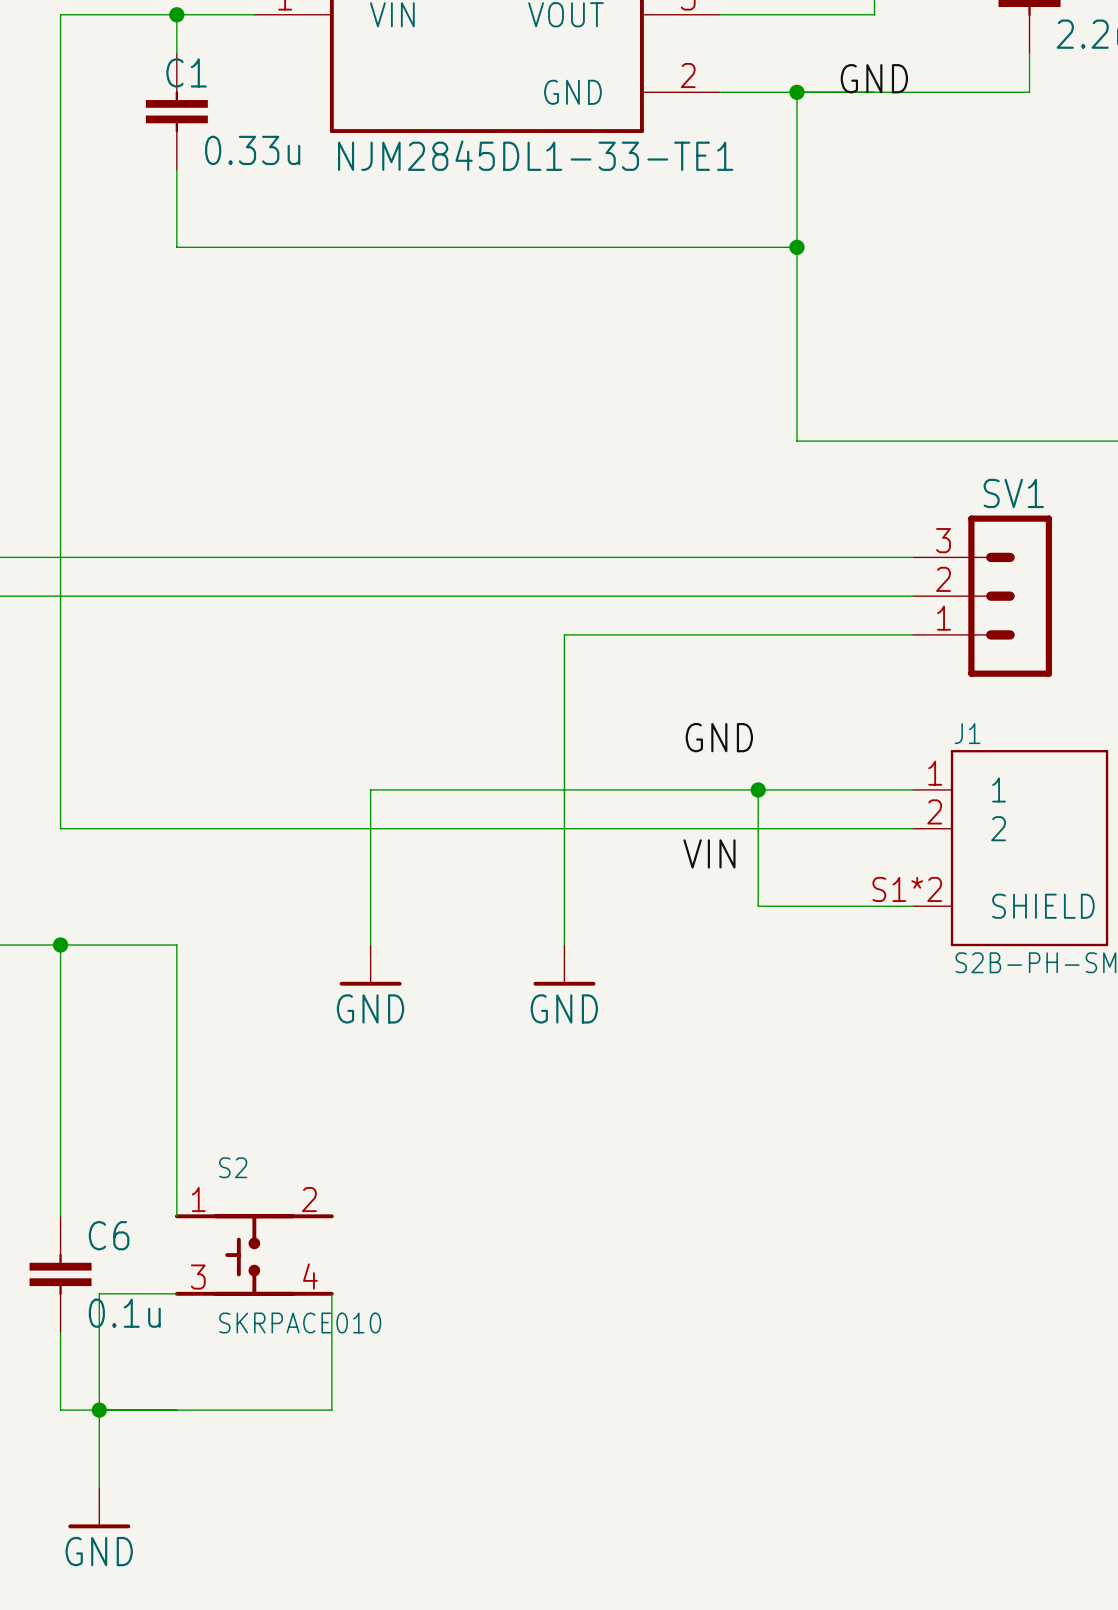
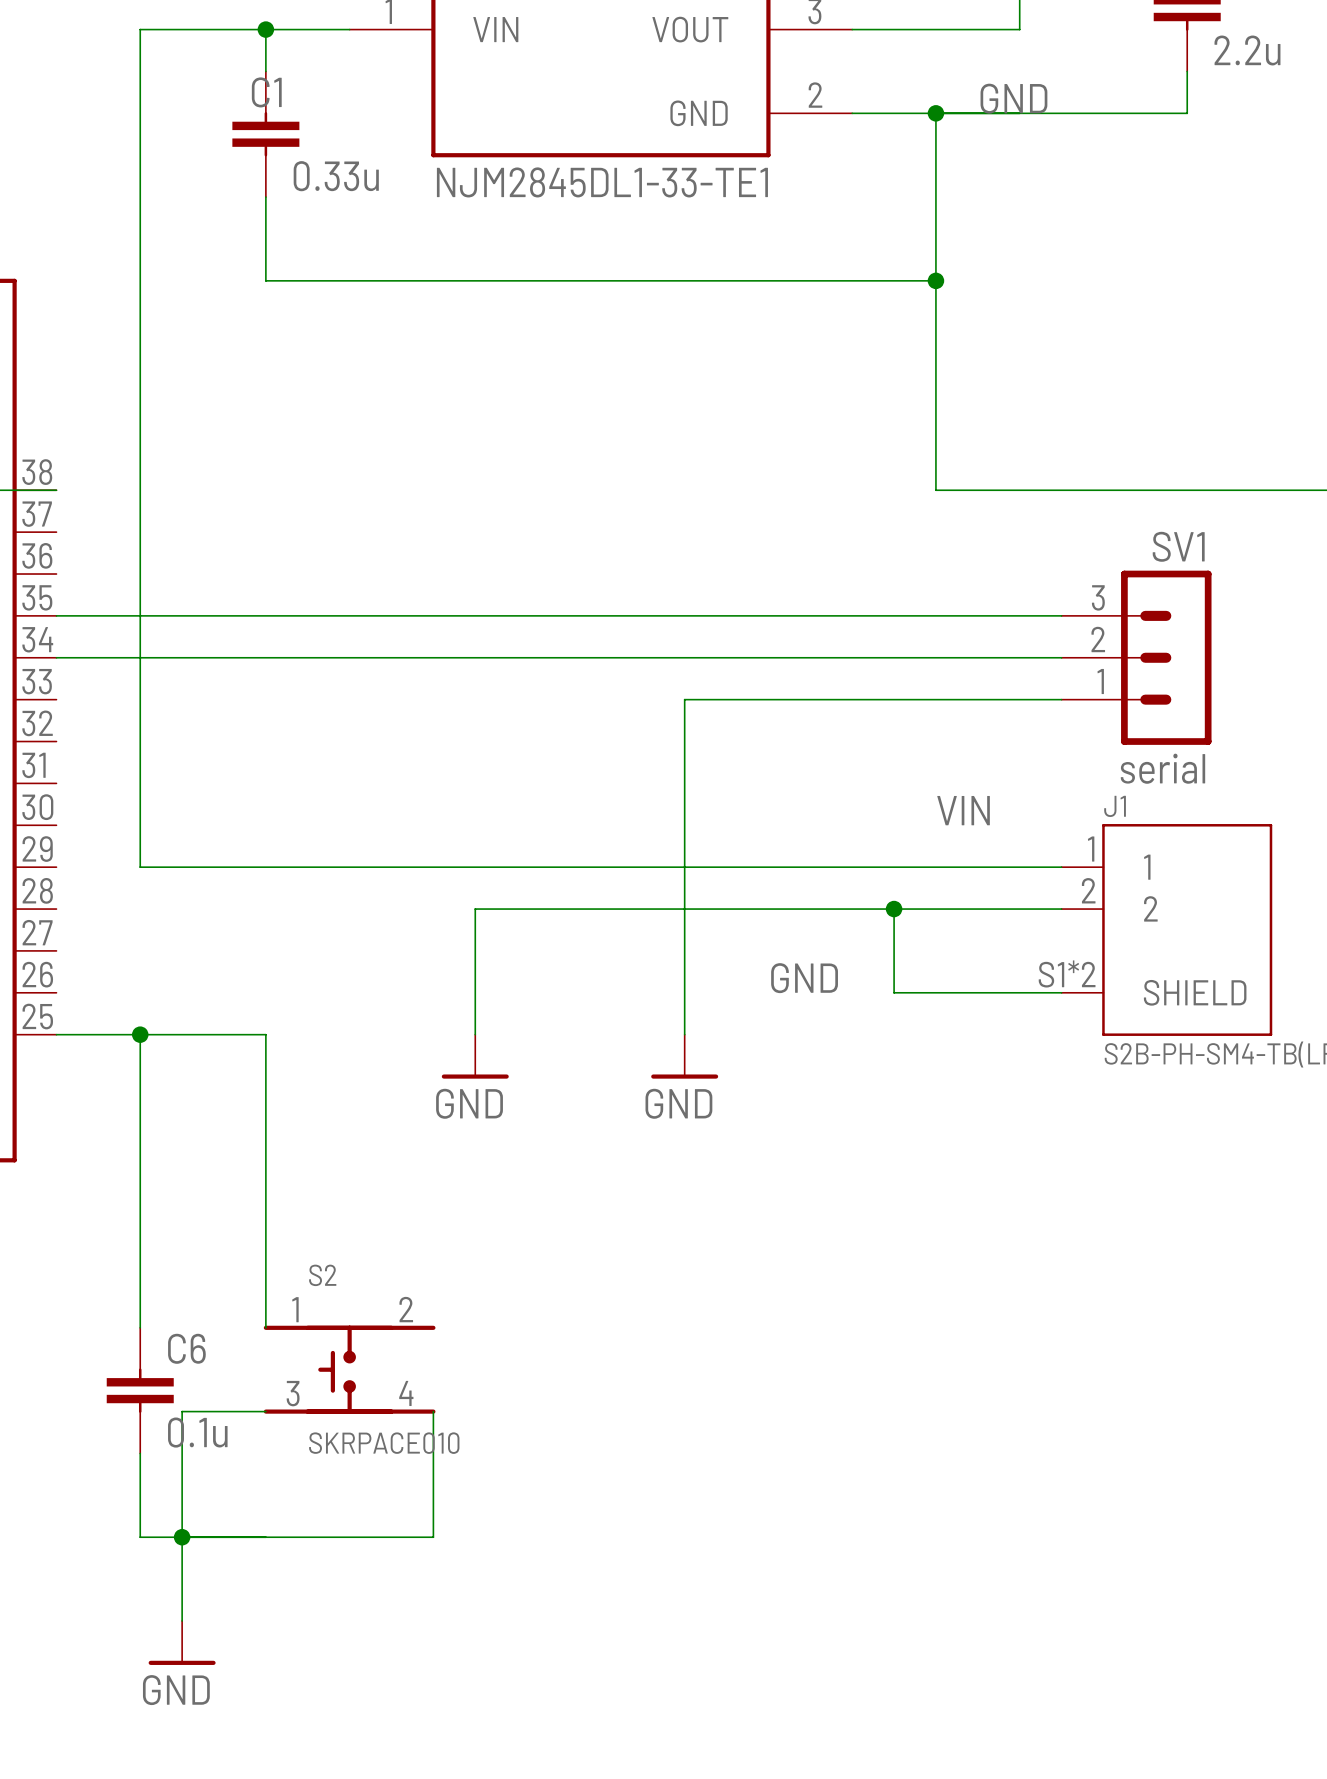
SV1 value: none -> serial (1162, 768)
label position: GND (719, 737) -> GND (804, 978)
wire: (60, 789) (60, 828) (370, 828) (370, 789) -> (140, 867) (475, 867)
wire: (758, 789) (758, 828) -> none
junction position: (758, 789) -> (894, 909)
label position: VIN (709, 853) -> VIN (963, 810)

